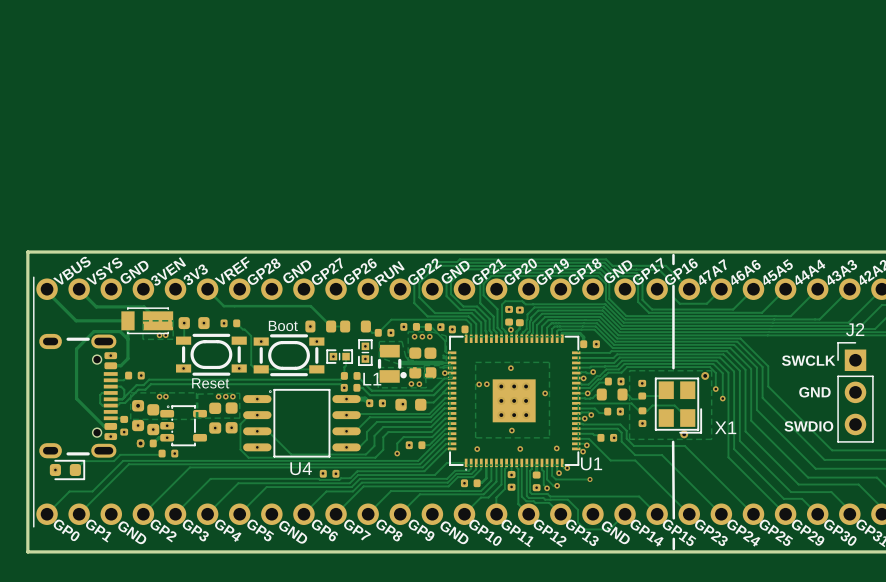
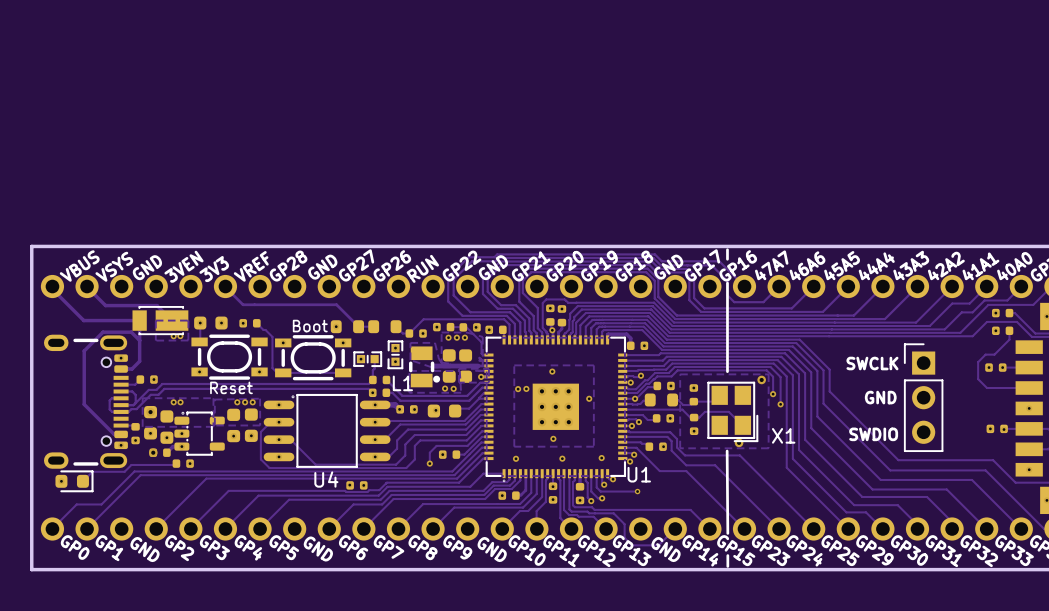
line: (33, 277) (33, 526) -> none
J2 name: J2 (855, 329) -> none

